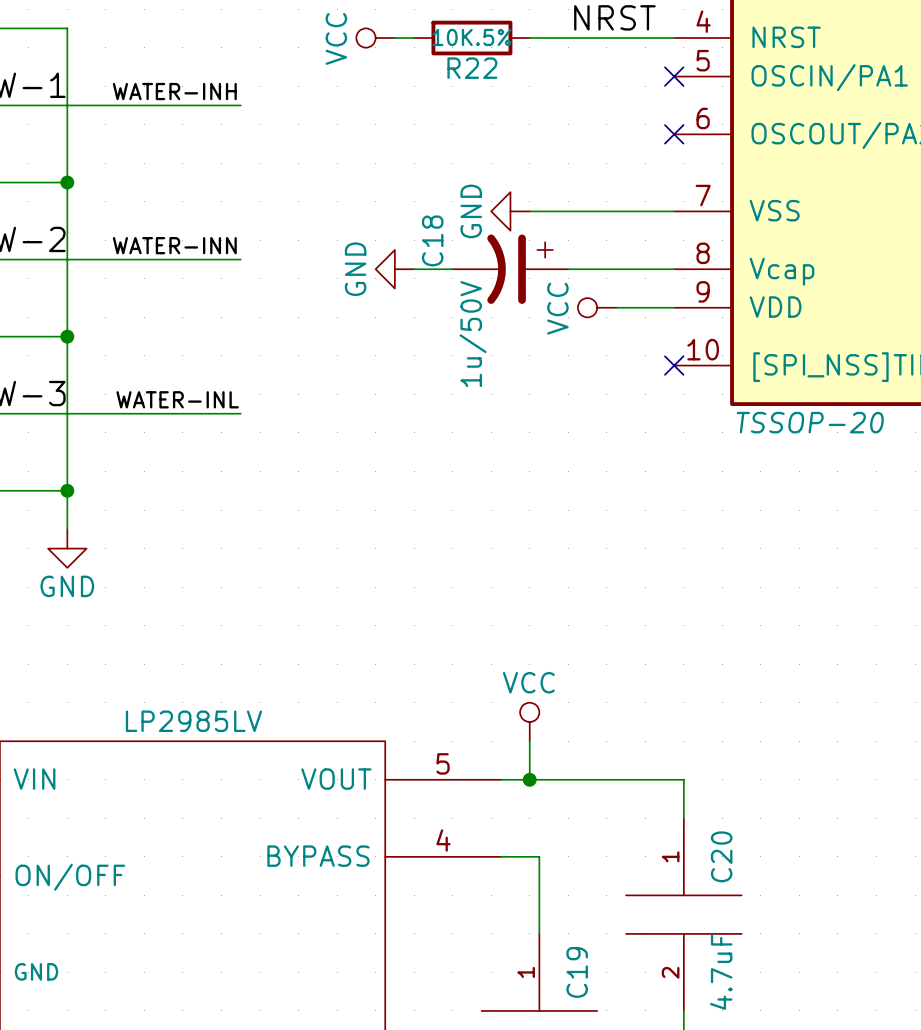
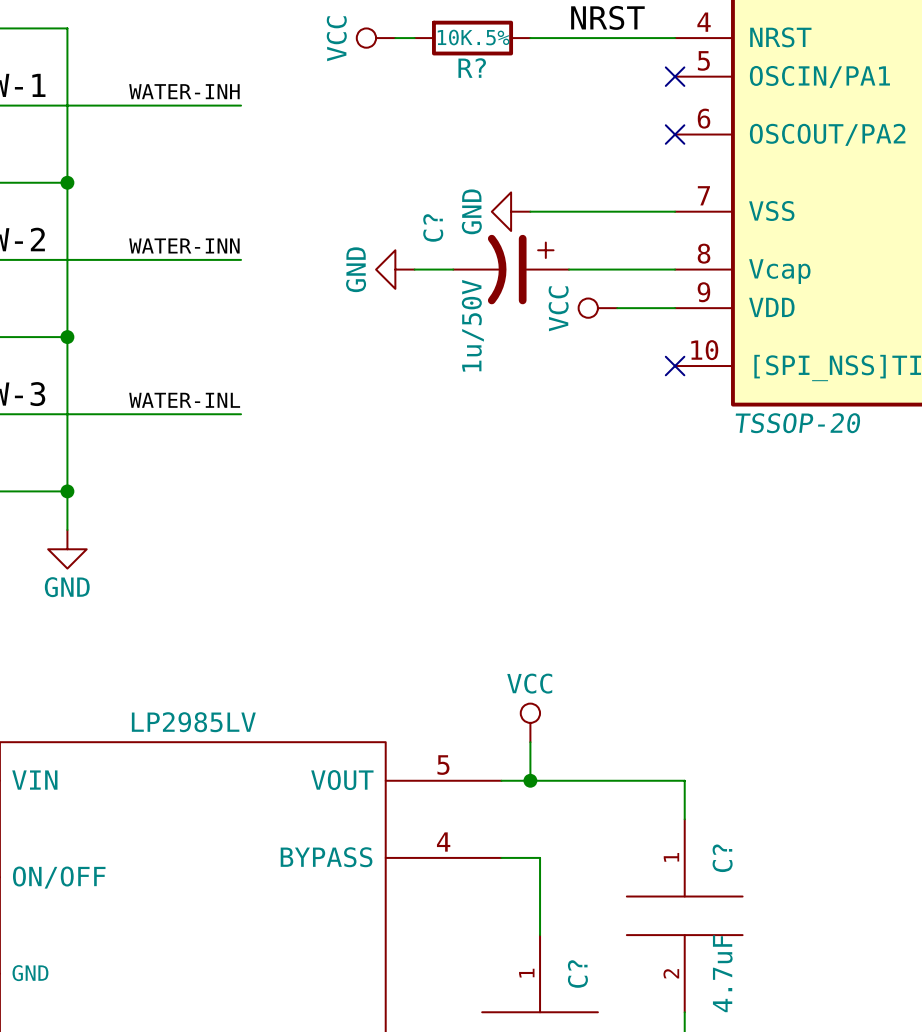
R22 name: R22 (472, 68) -> R? (472, 68)
C18 name: C18 (432, 240) -> C? (433, 227)
C20 name: C20 (721, 856) -> C? (722, 858)
C19 name: C19 (577, 972) -> C? (577, 974)

